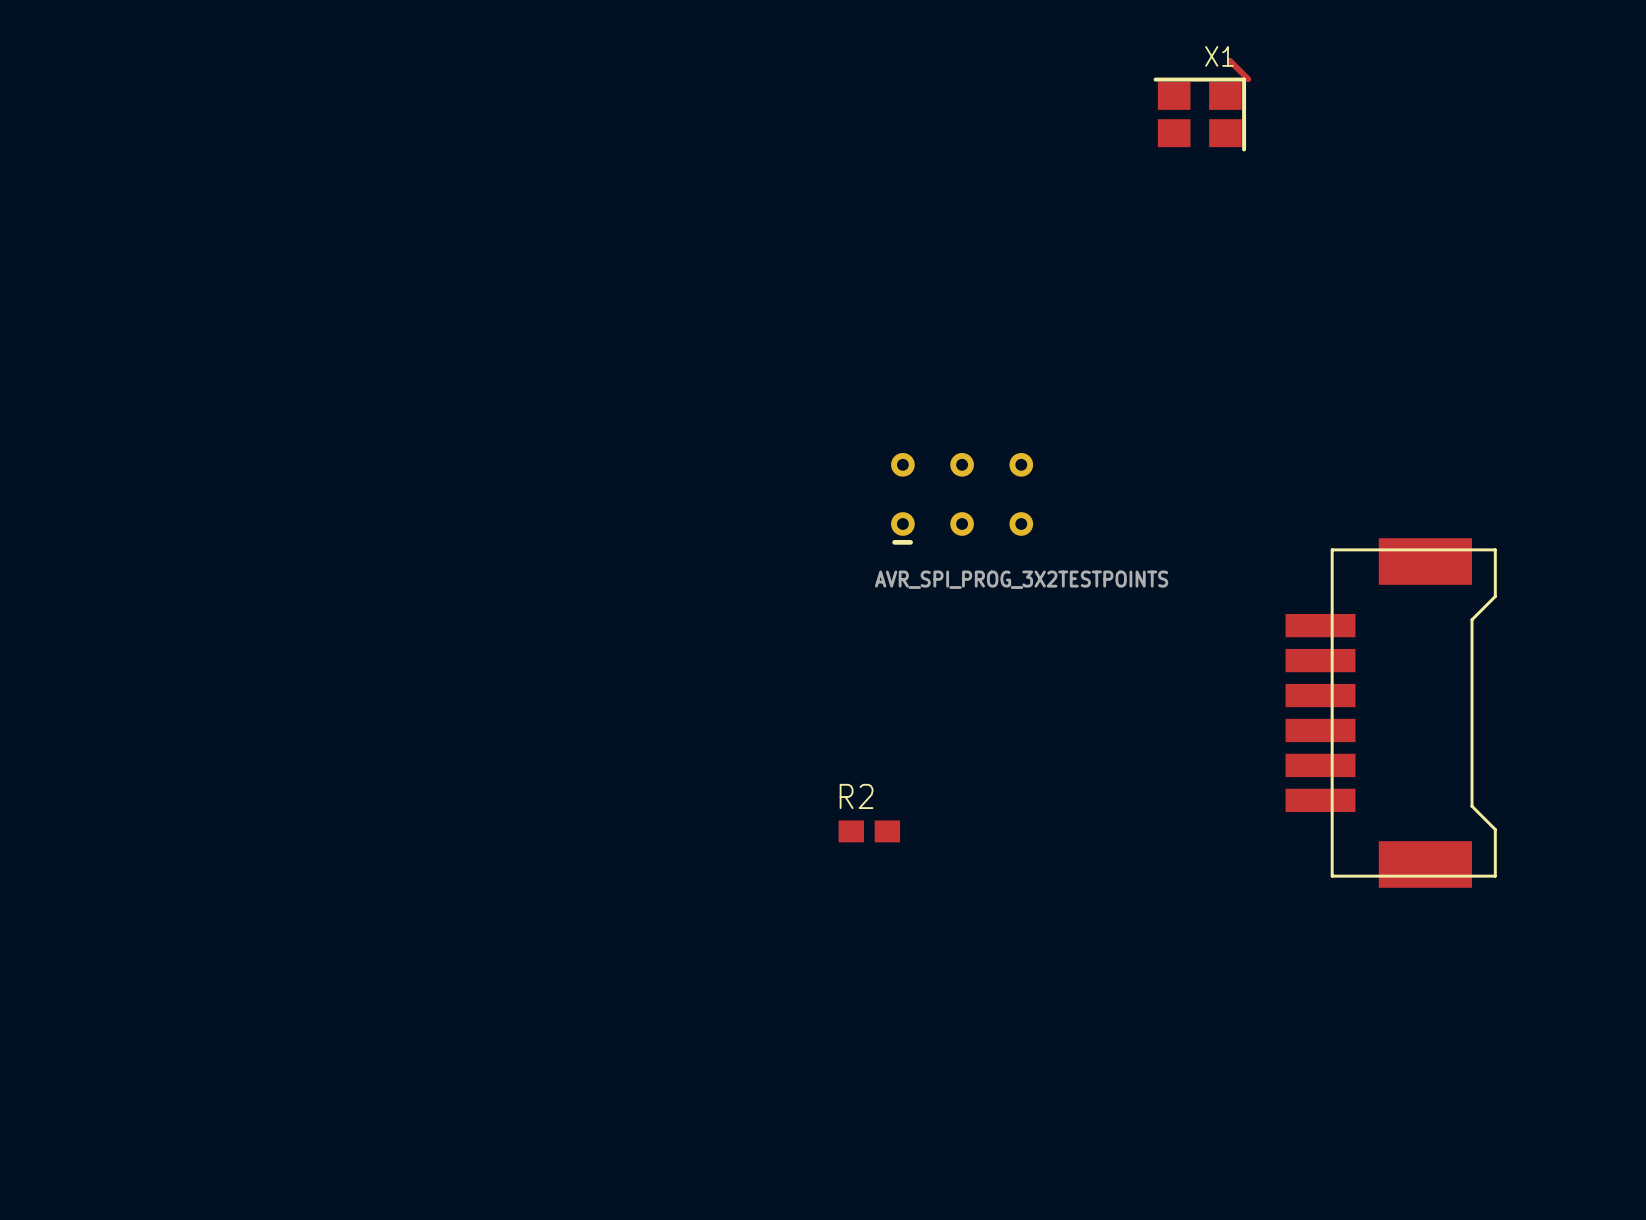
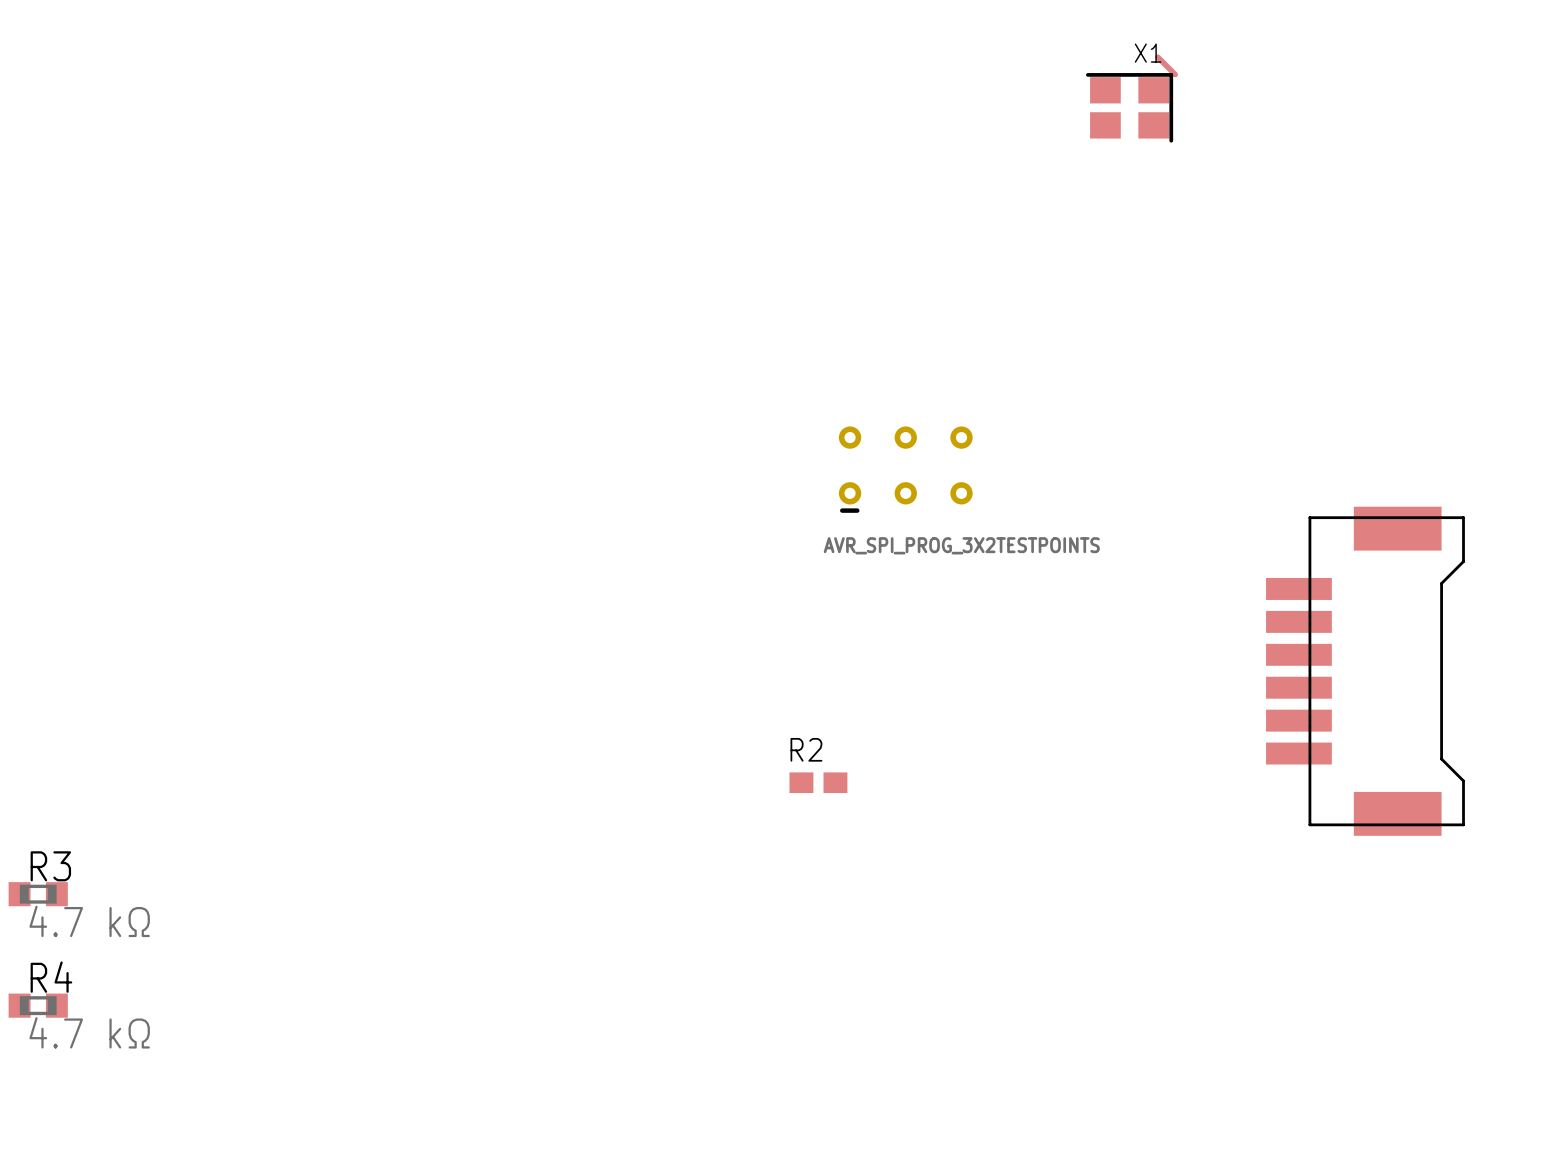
part position: (1391, 713) -> (1365, 671)
R3: none -> 4.7 kΩ (38, 894)
R4: none -> 4.7 kΩ (38, 1005)

